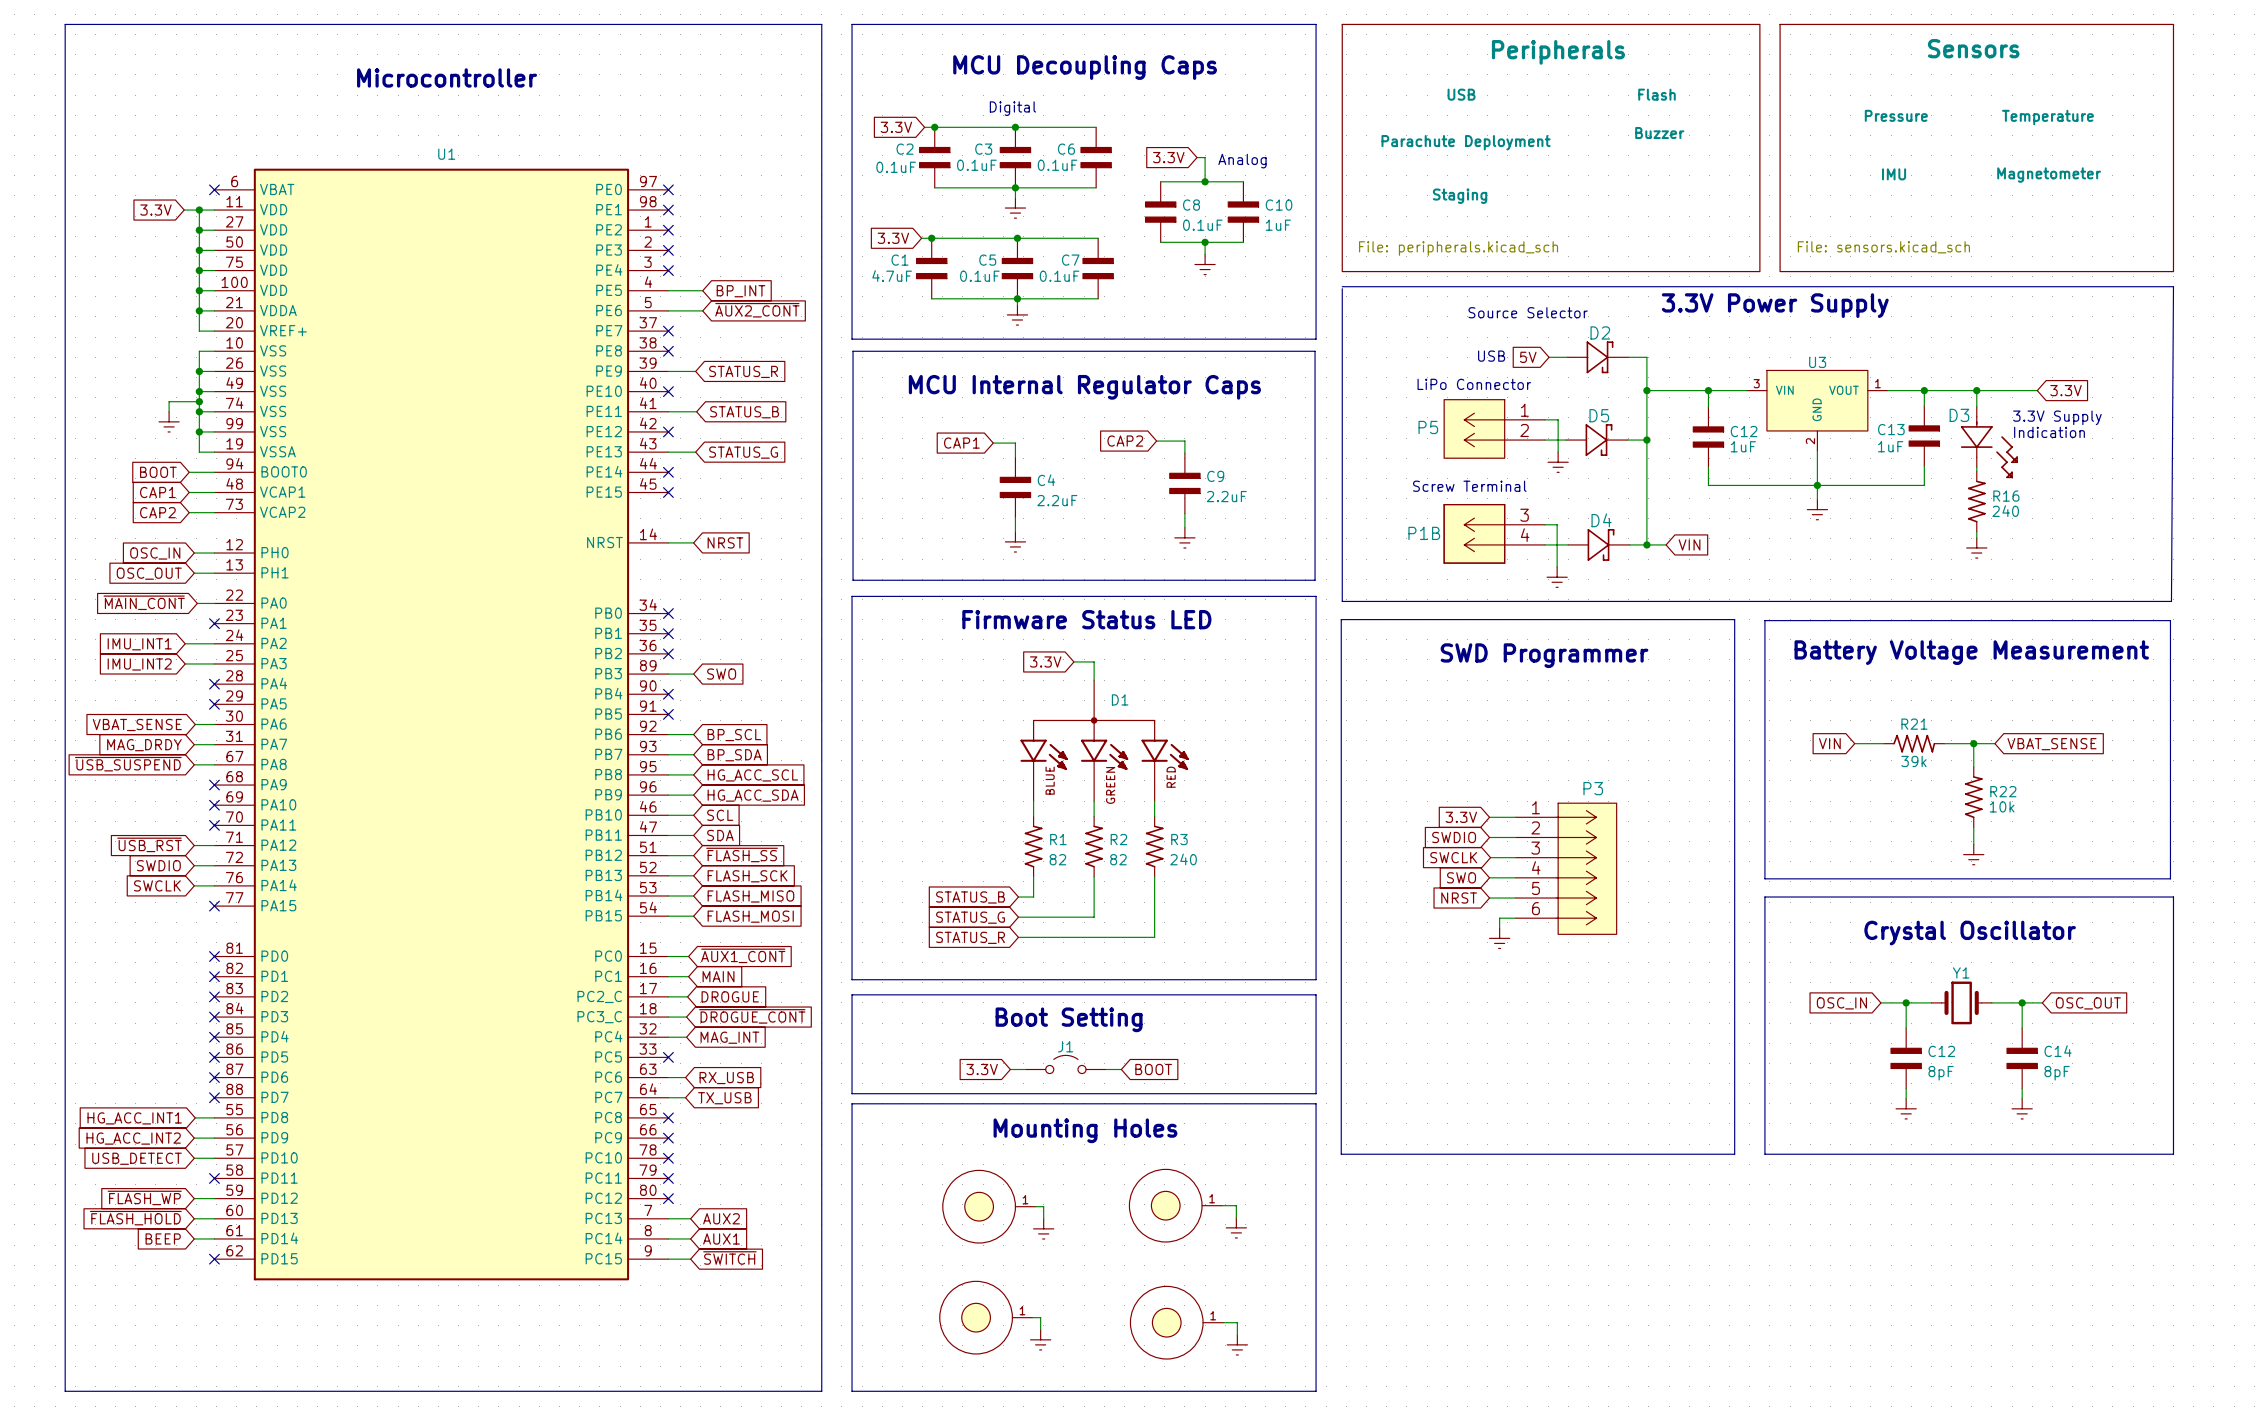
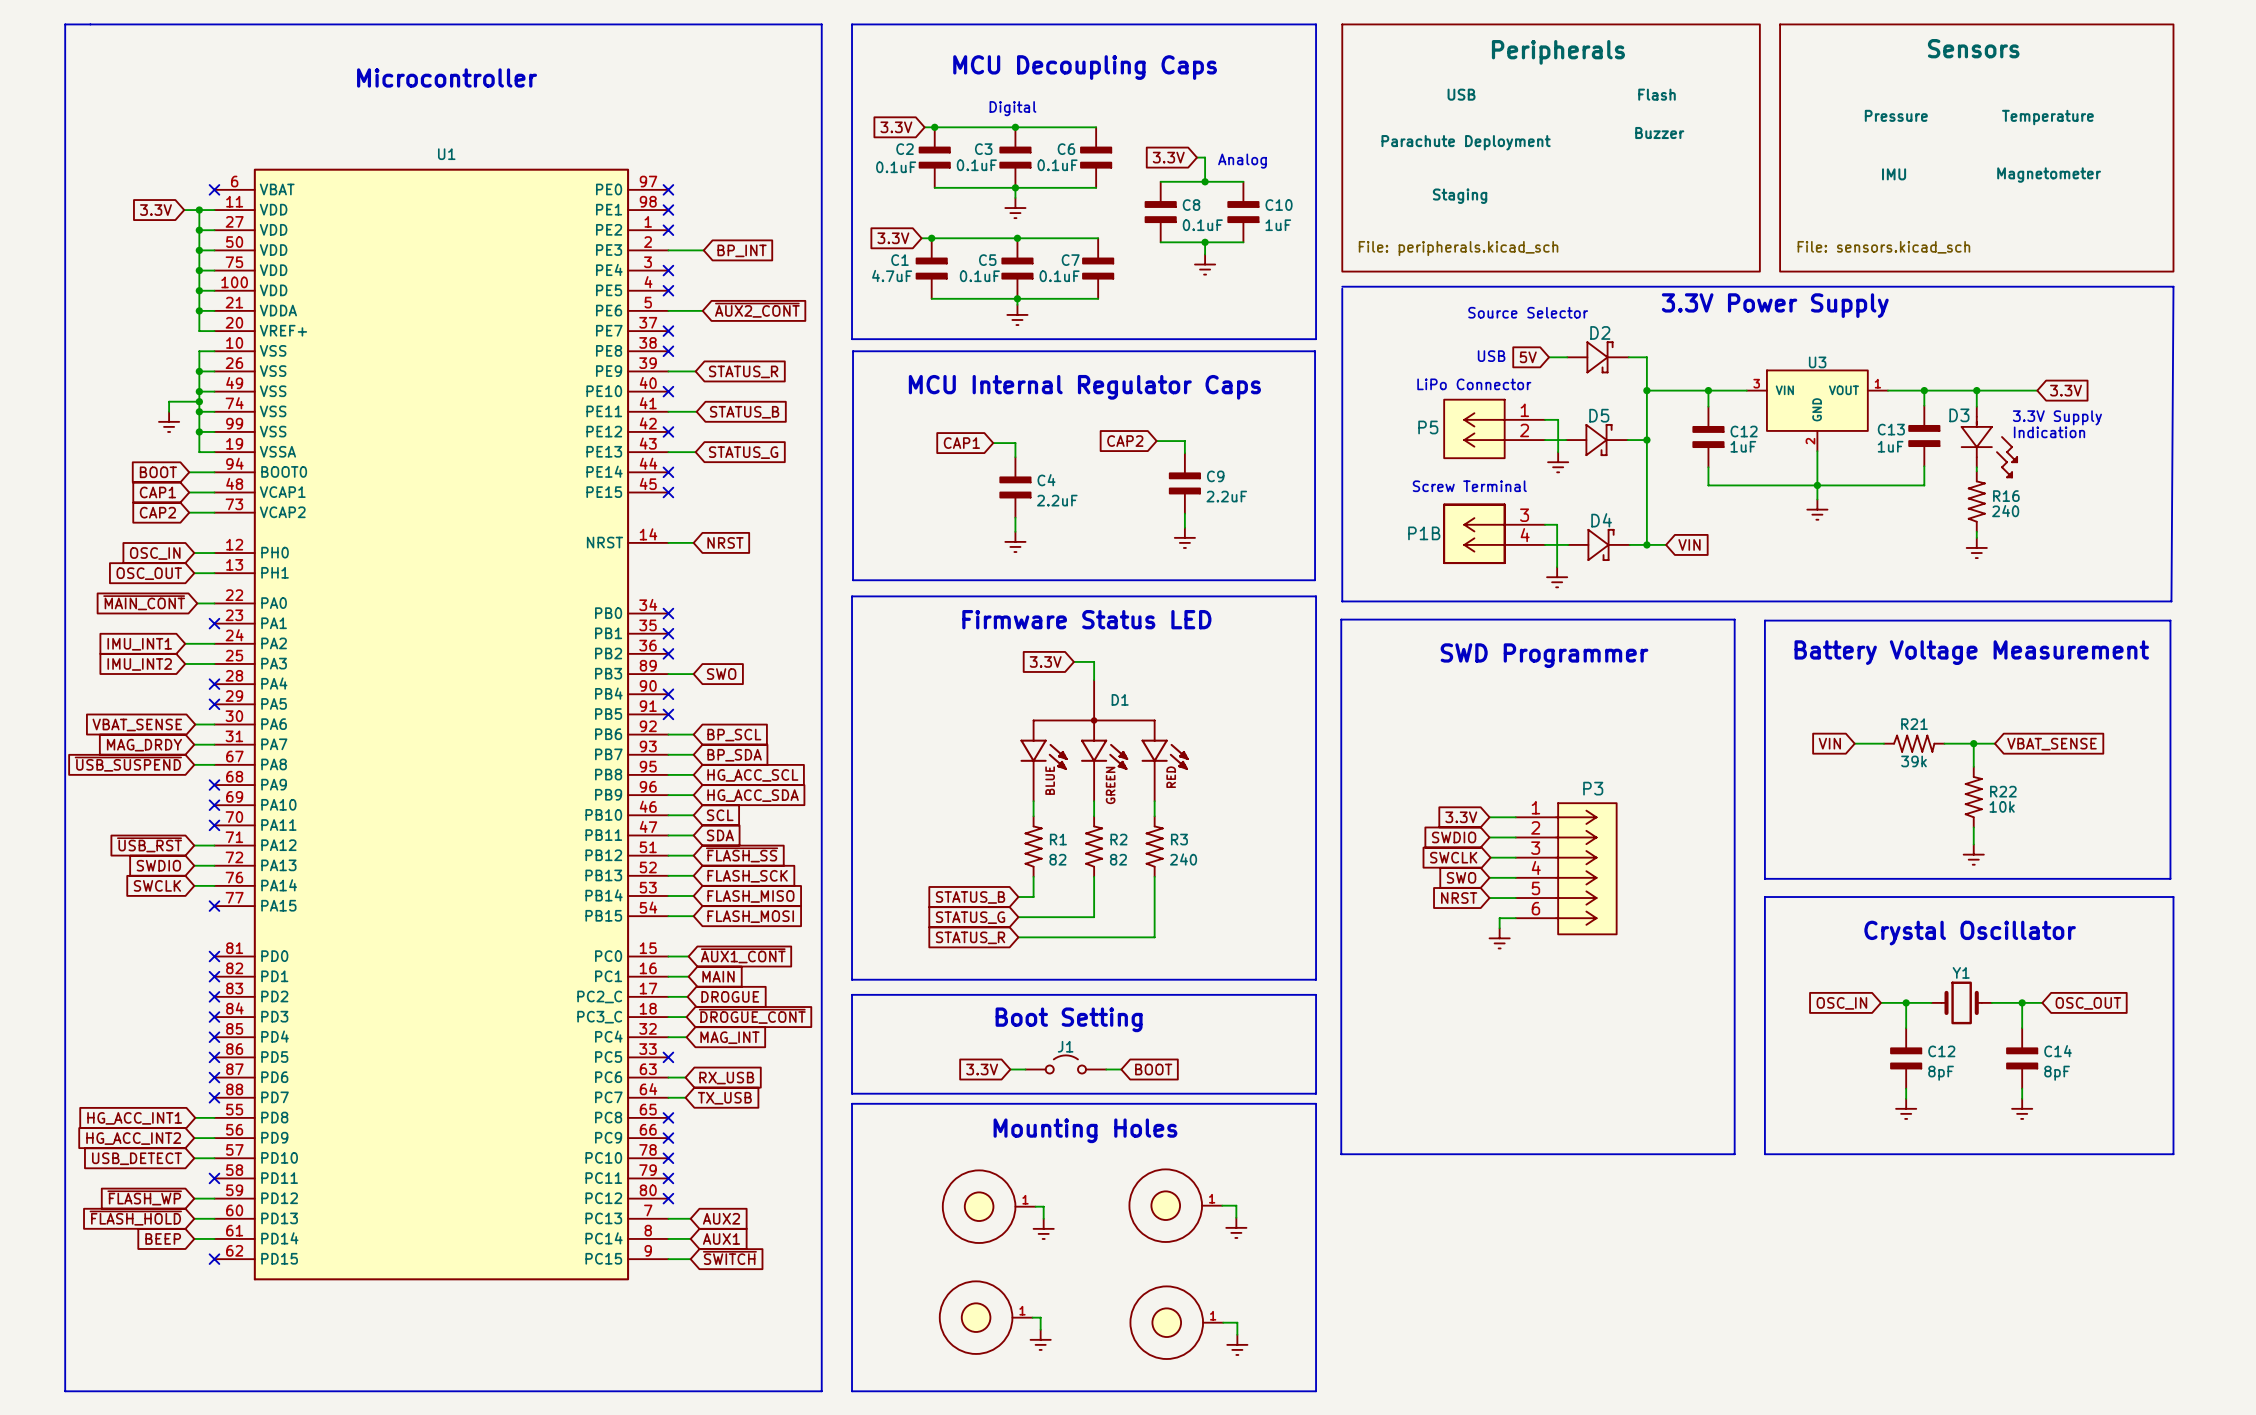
wire: none -> (668, 250) (703, 250)
no-connect mark position: (668, 250) -> (668, 290)
wire: (668, 290) (702, 290) -> none
global label position: BP_INT (741, 291) -> BP_INT (742, 250)

